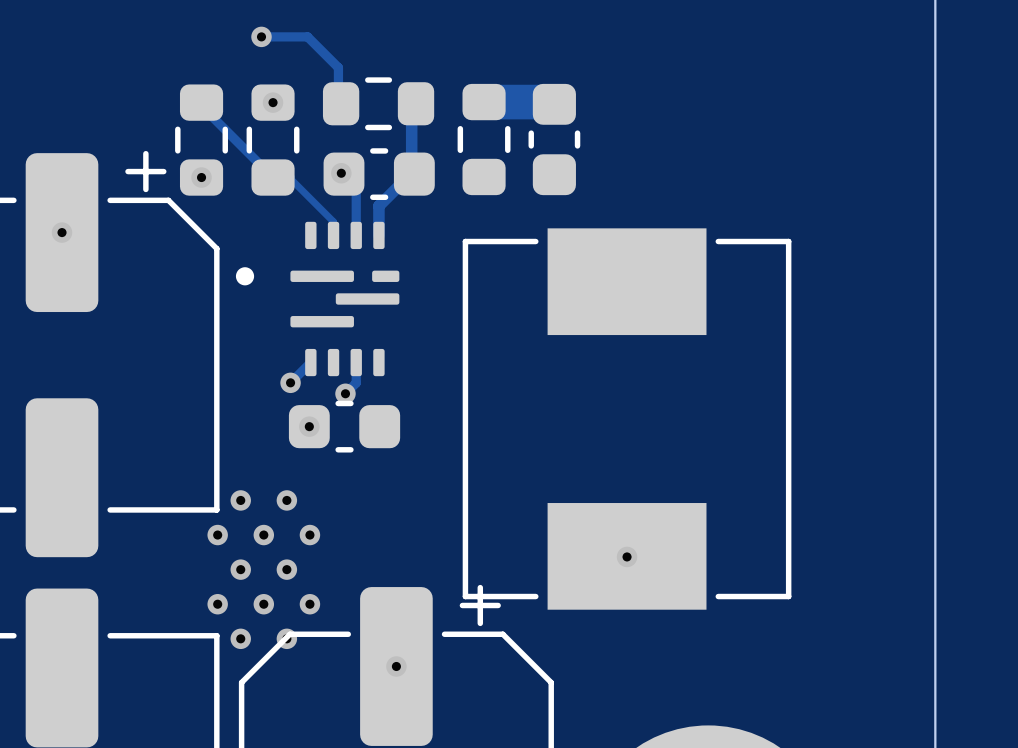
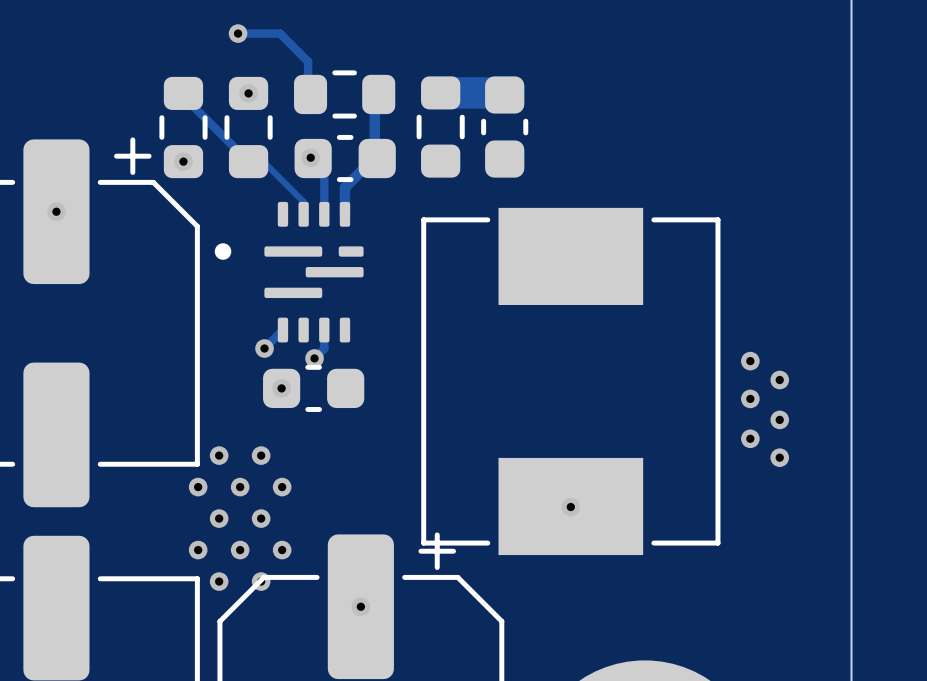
via: none -> (750, 361)
via: none -> (779, 380)
via: none -> (750, 398)
via: none -> (779, 419)
via: none -> (750, 438)
via: none -> (779, 457)

